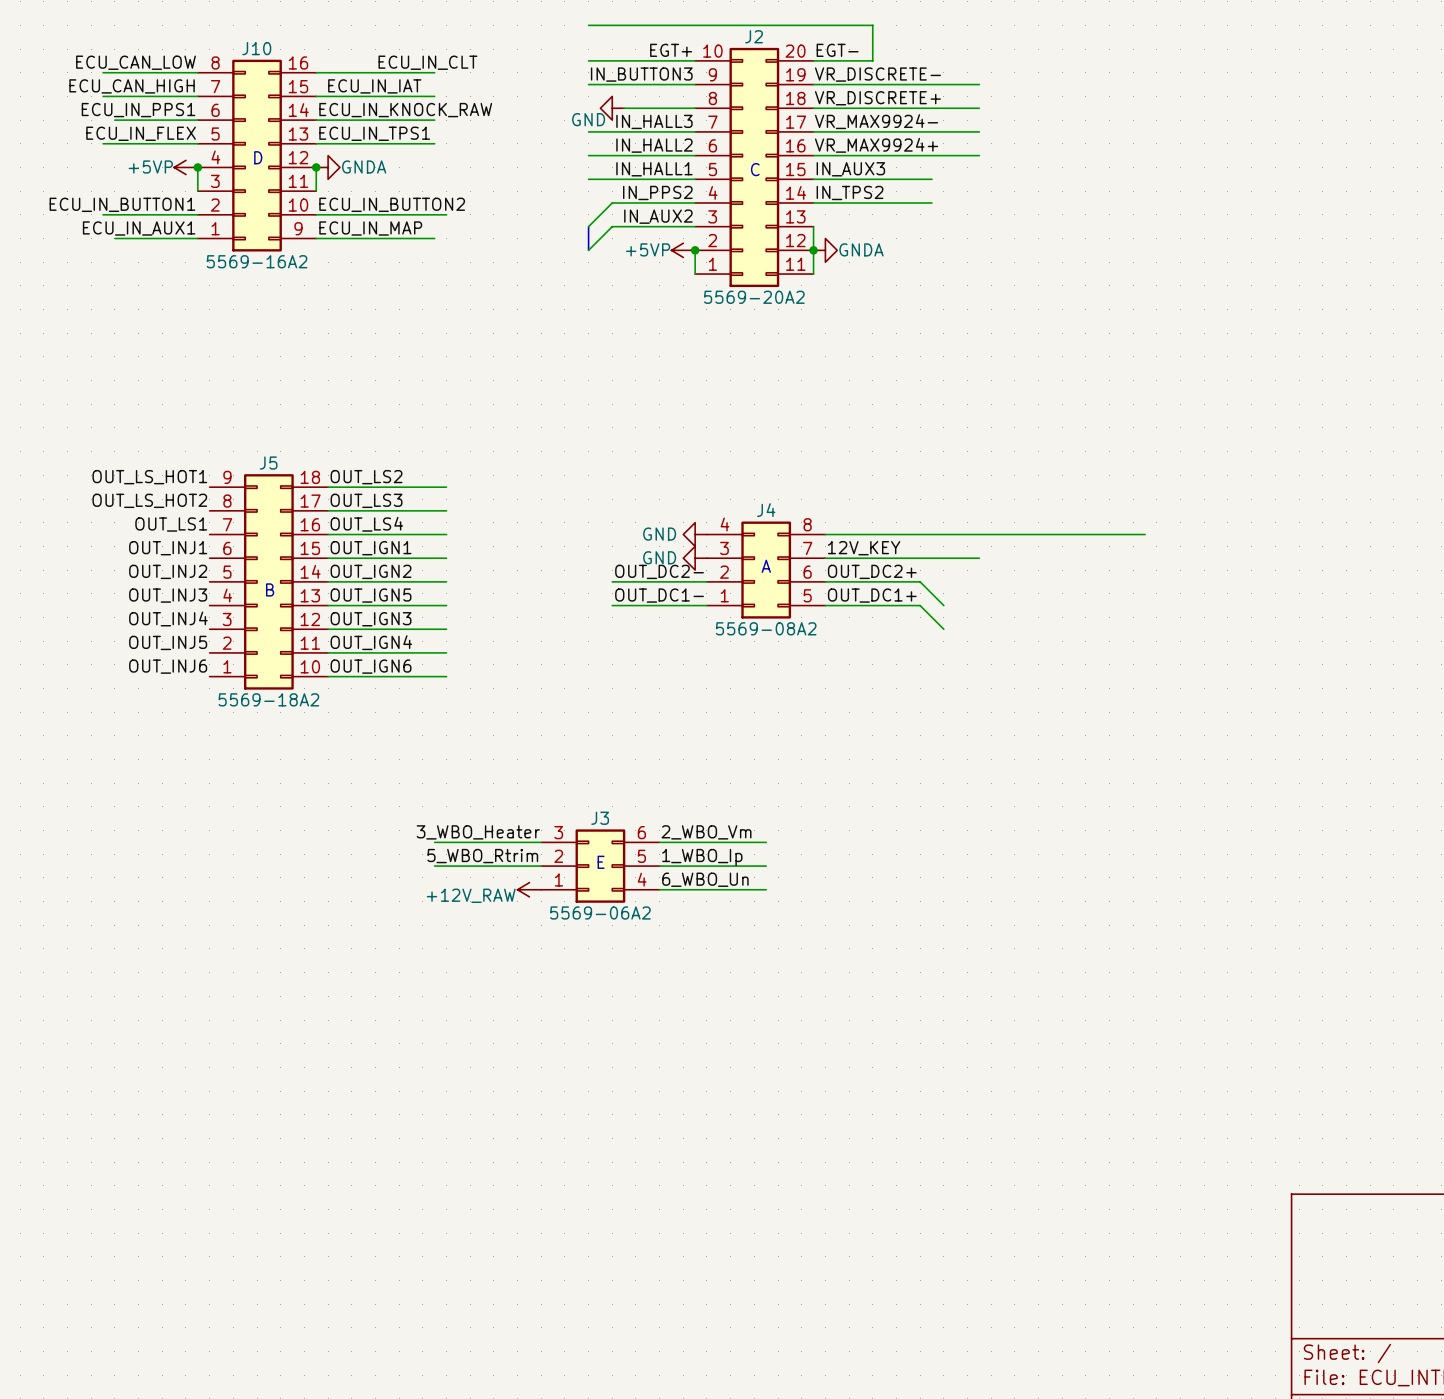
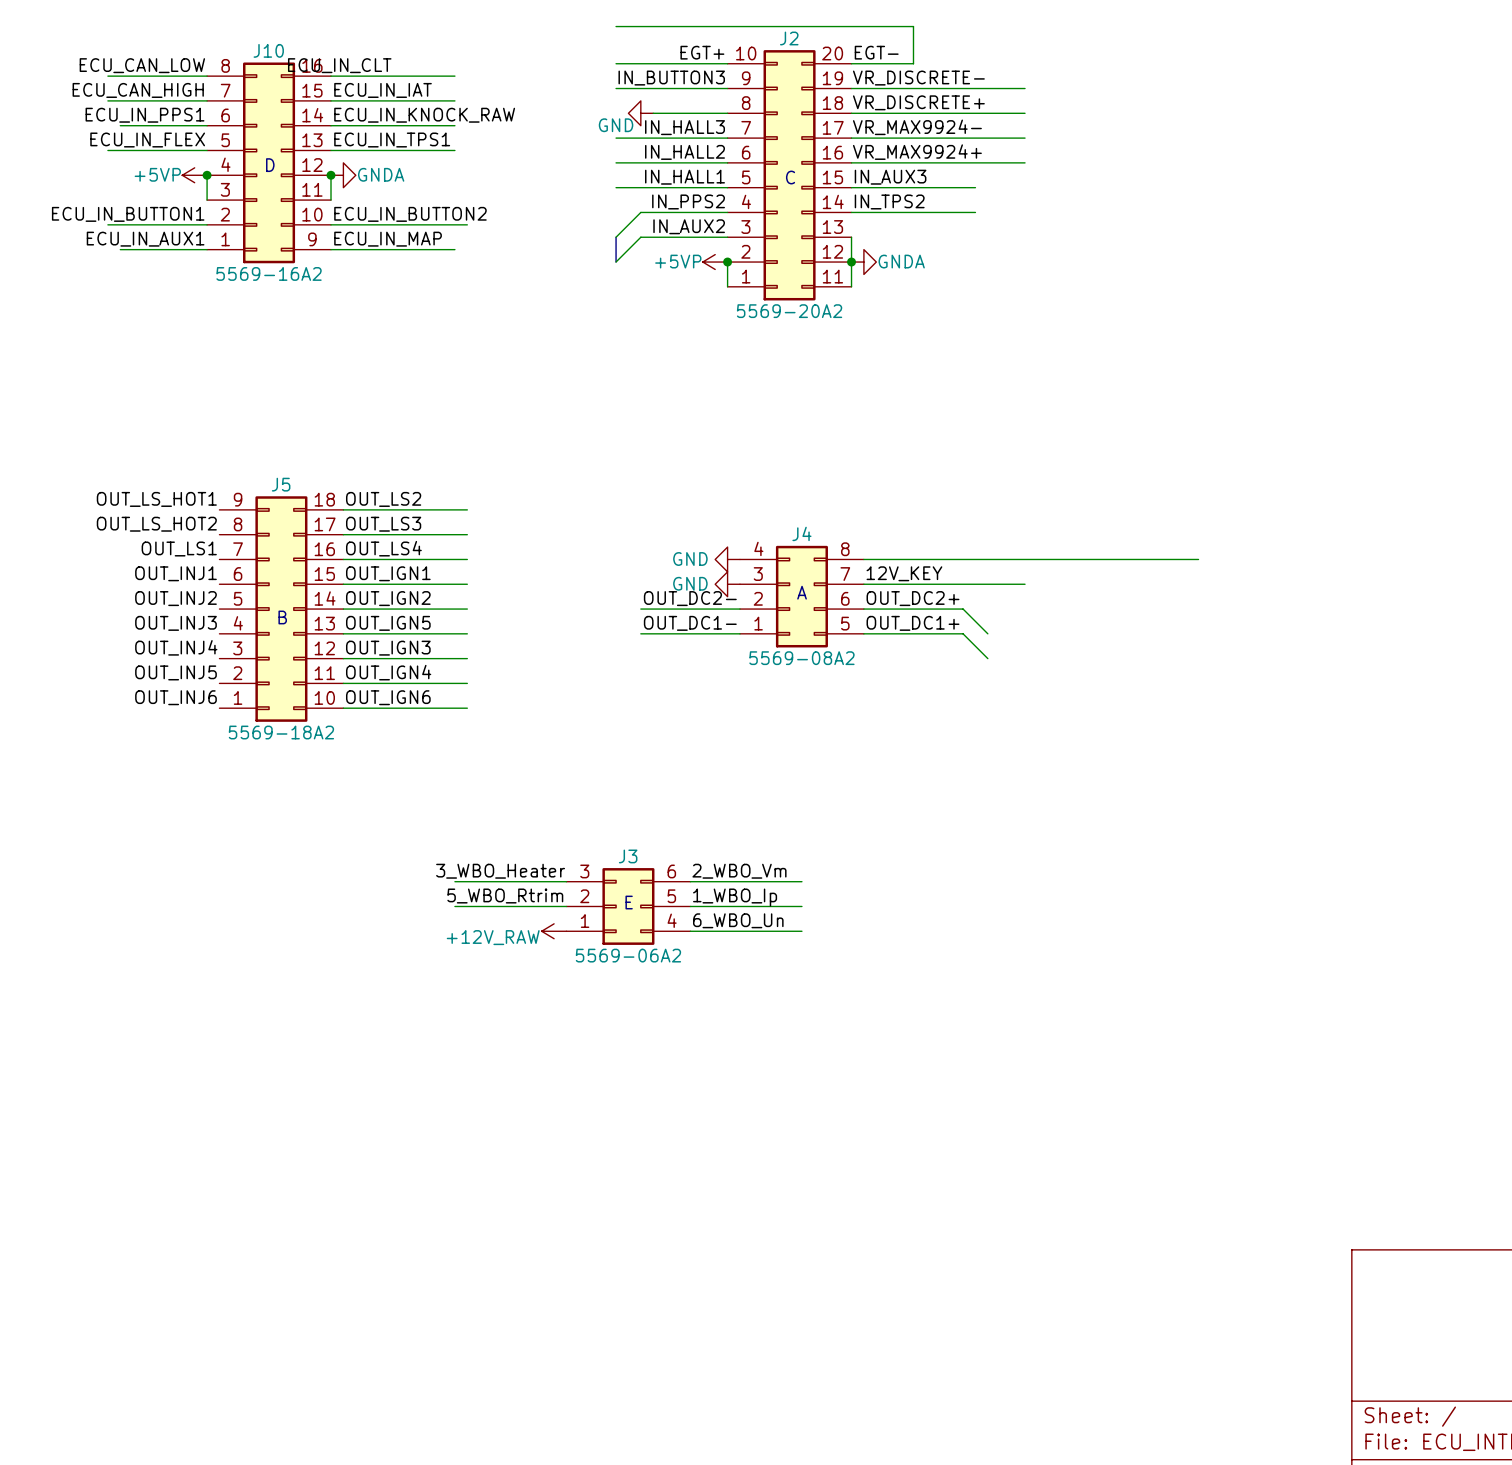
label position: ECU_IN_CLT (427, 62) -> ECU_IN_CLT (339, 65)
label position: ECU_IN_IAT (374, 86) -> ECU_IN_IAT (383, 90)

